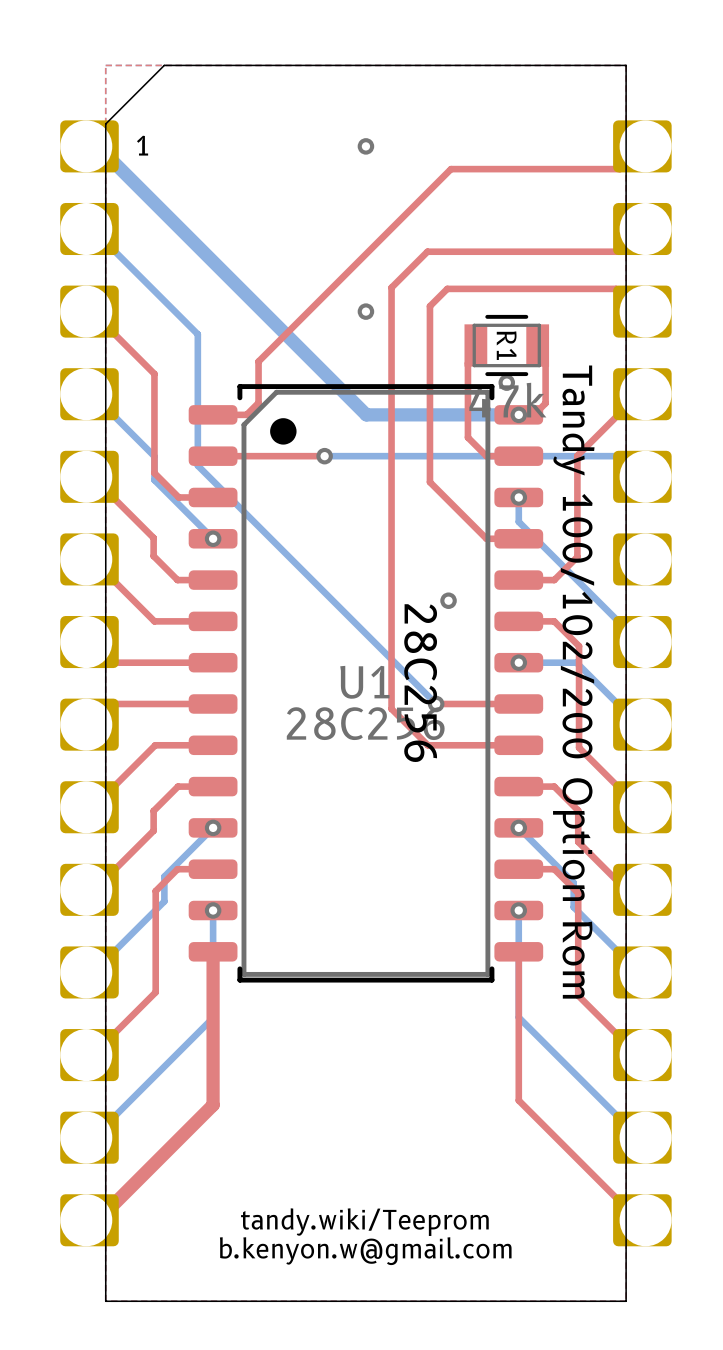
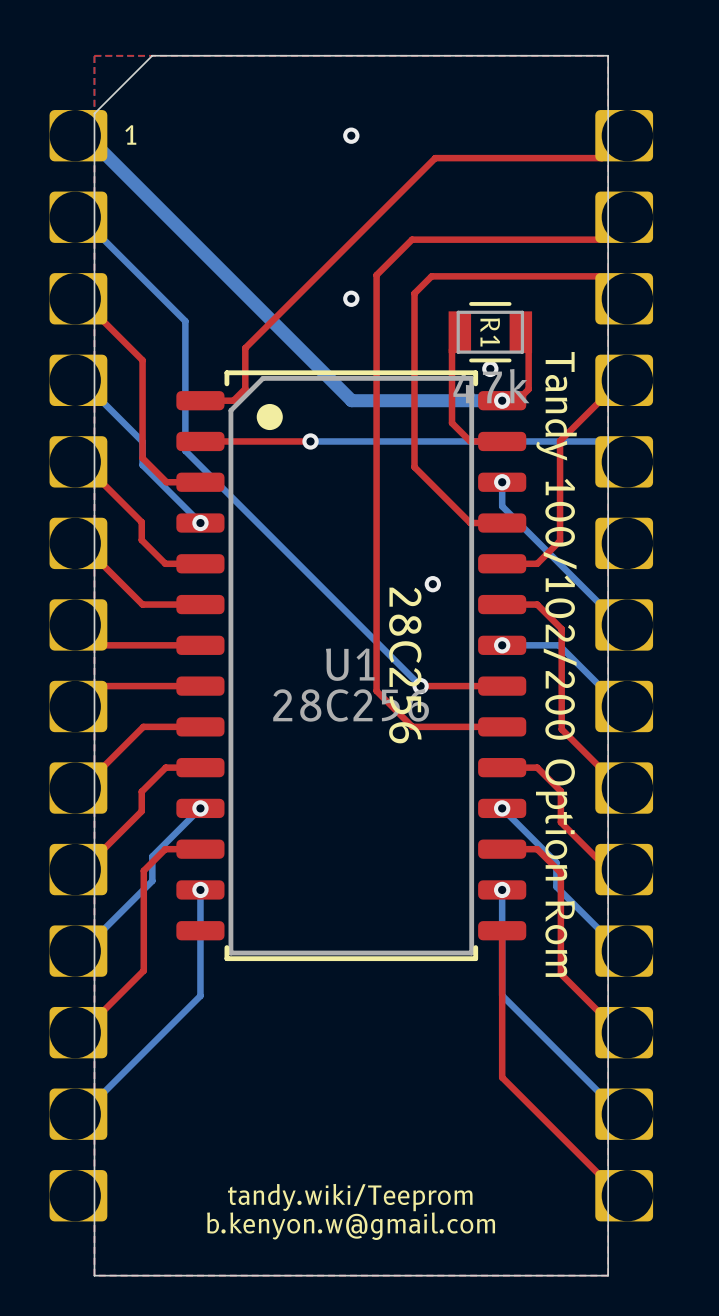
top track: (213, 951) (213, 1105) (97, 1220) -> none

